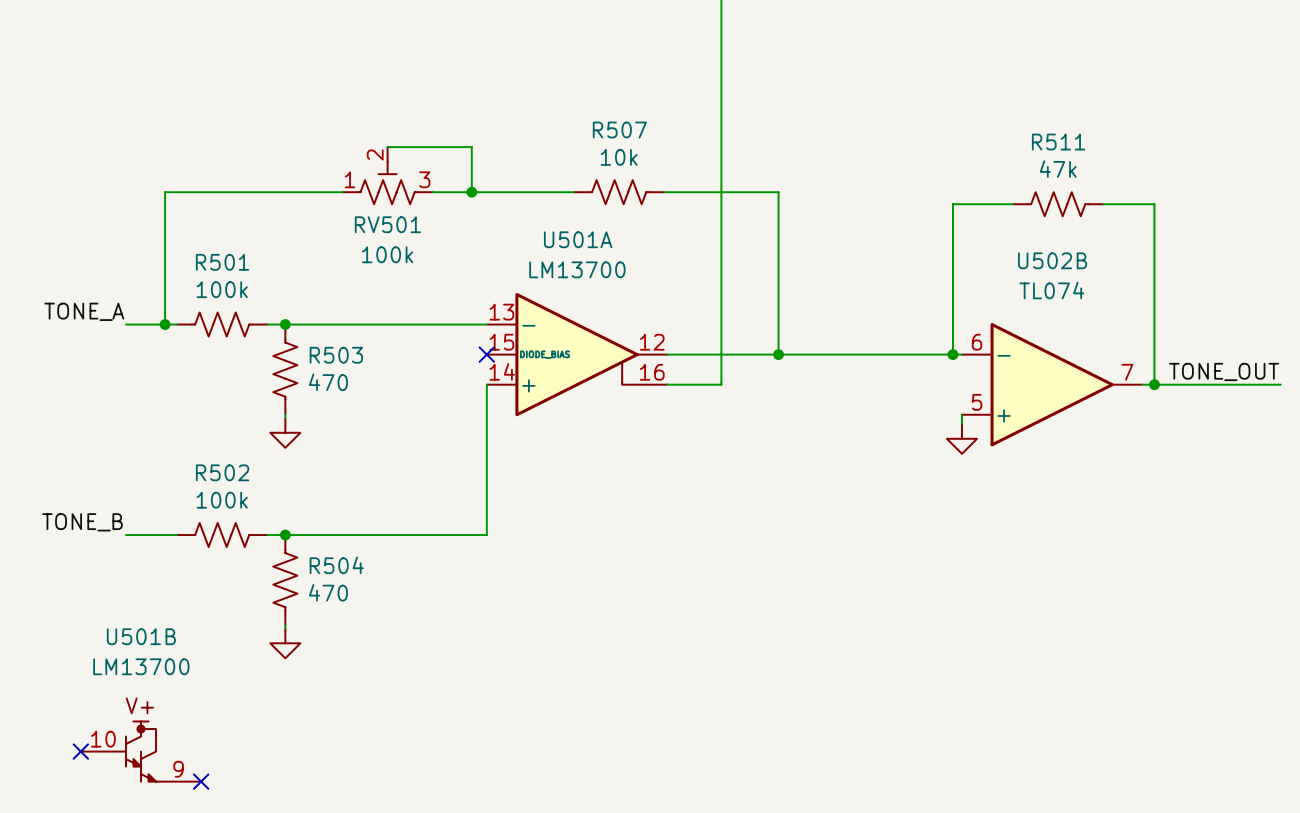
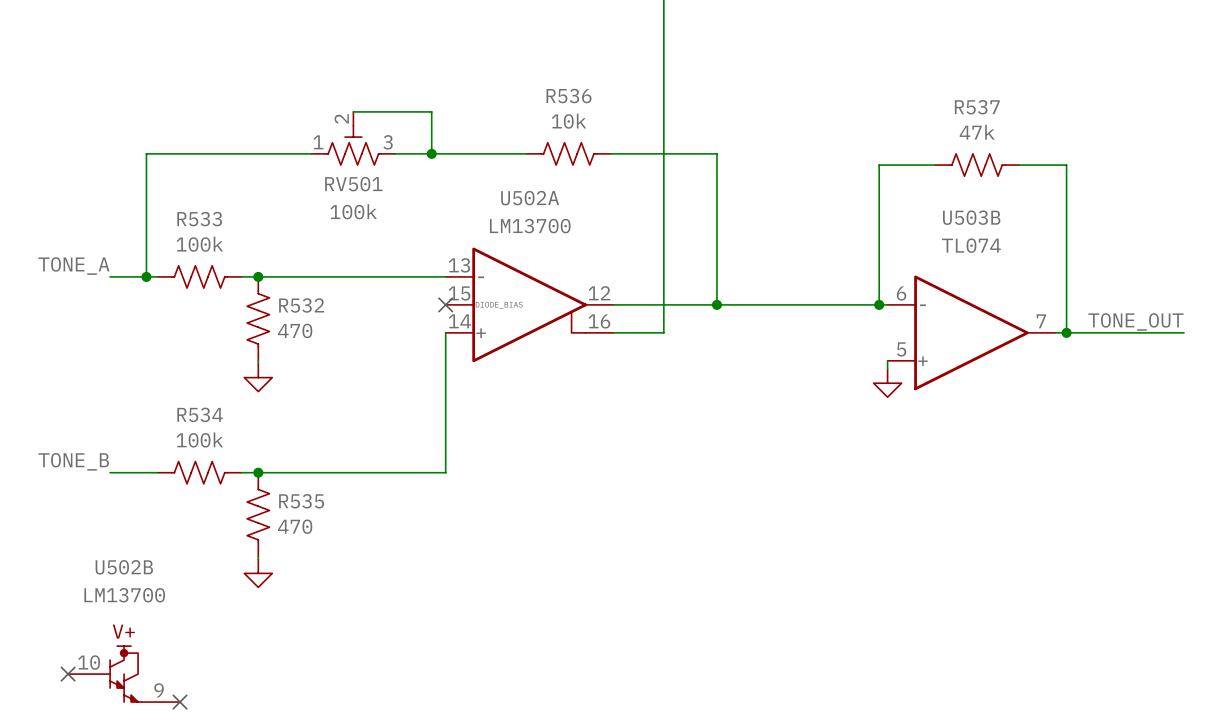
R507 name: R507 (619, 130) -> R536 (569, 96)
R511 name: R511 (1058, 142) -> R537 (977, 107)
U501A name: U501A (578, 239) -> U502A (530, 198)
U502B name: U502B (1052, 260) -> U503B (971, 217)
R501 name: R501 (222, 262) -> R533 (199, 219)
R503 name: R503 (336, 355) -> R532 (301, 305)
R502 name: R502 (222, 472) -> R534 (200, 414)
R504 name: R504 (336, 565) -> R535 (301, 501)
U501B name: U501B (141, 636) -> U502B (124, 567)

